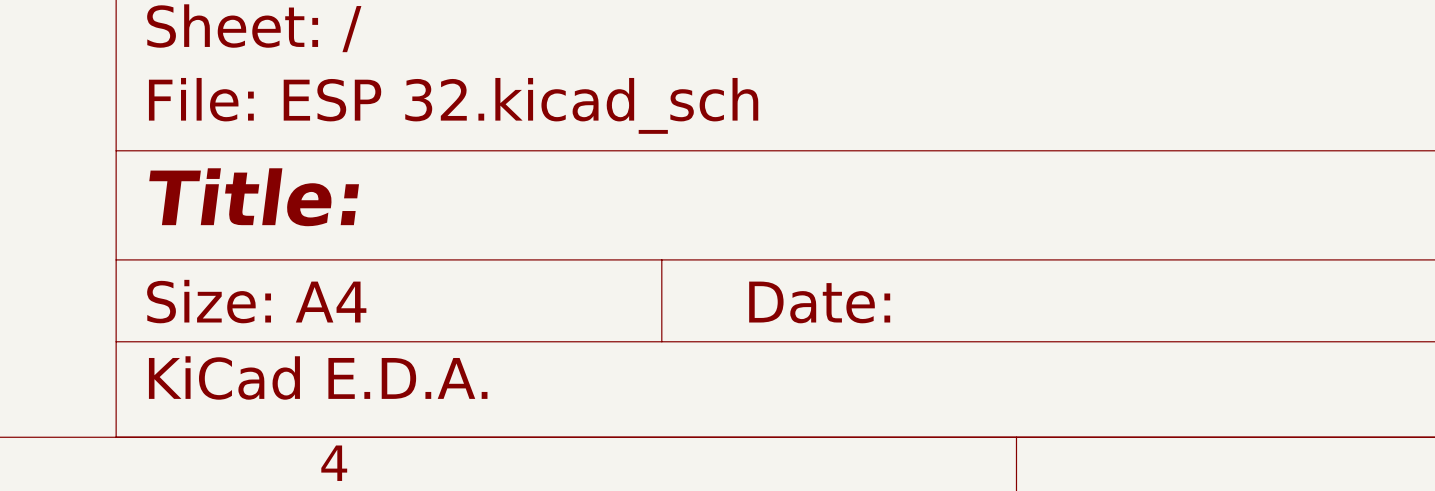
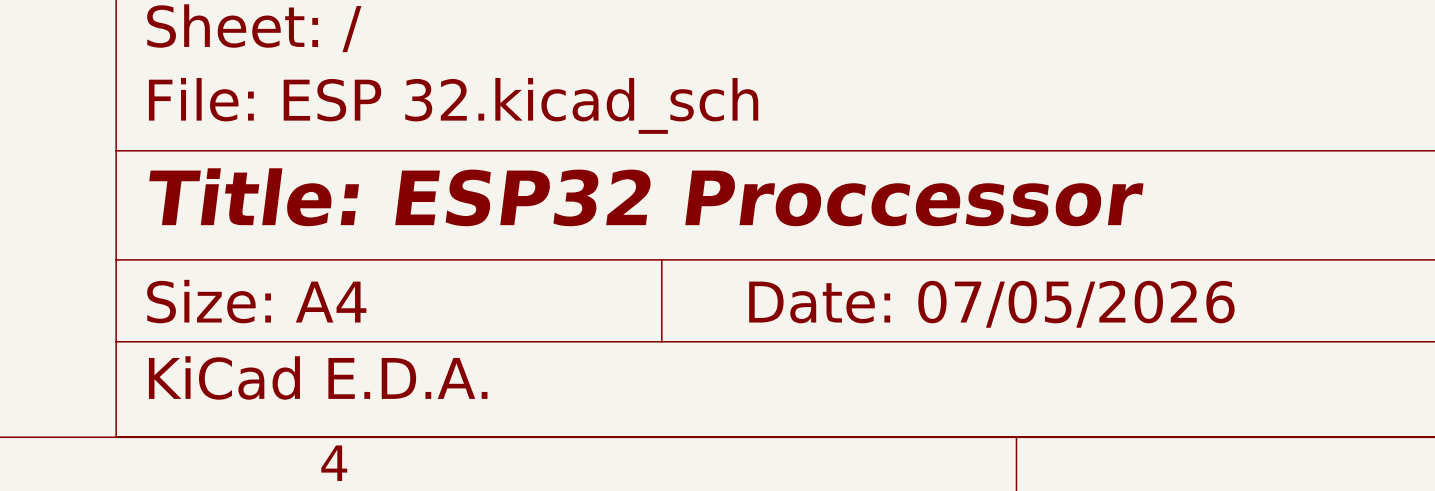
title block: Title: (254, 197) -> Title: ESP32 Proccessor (646, 197)
title block: Date: (819, 302) -> Date: 07/05/2026 (991, 304)

